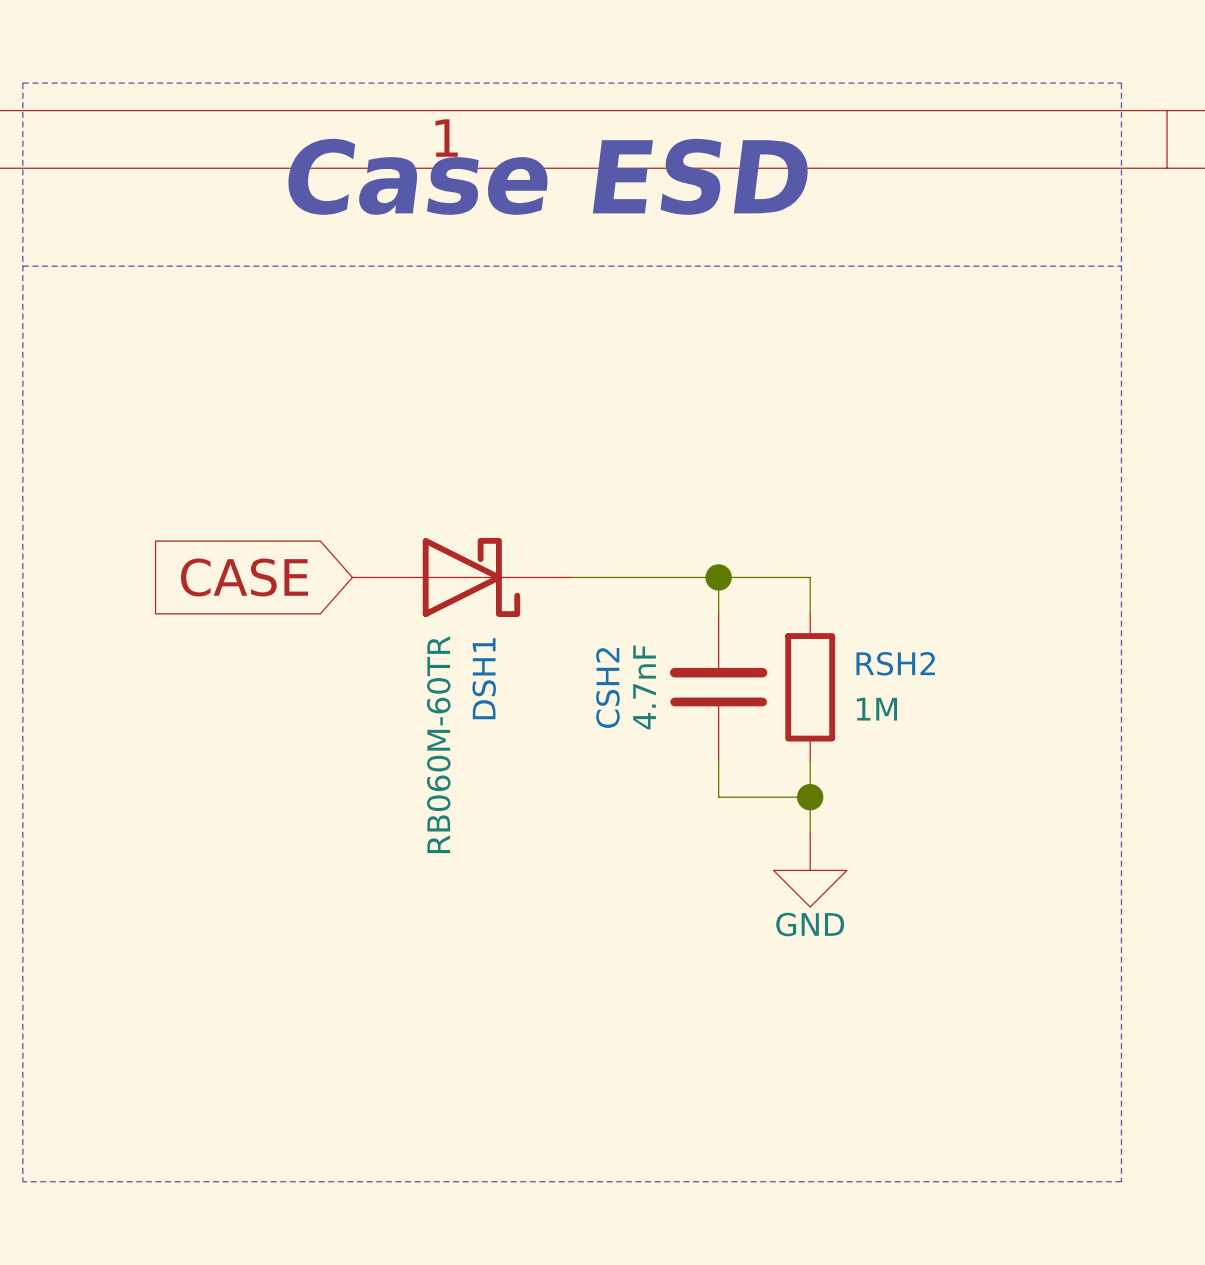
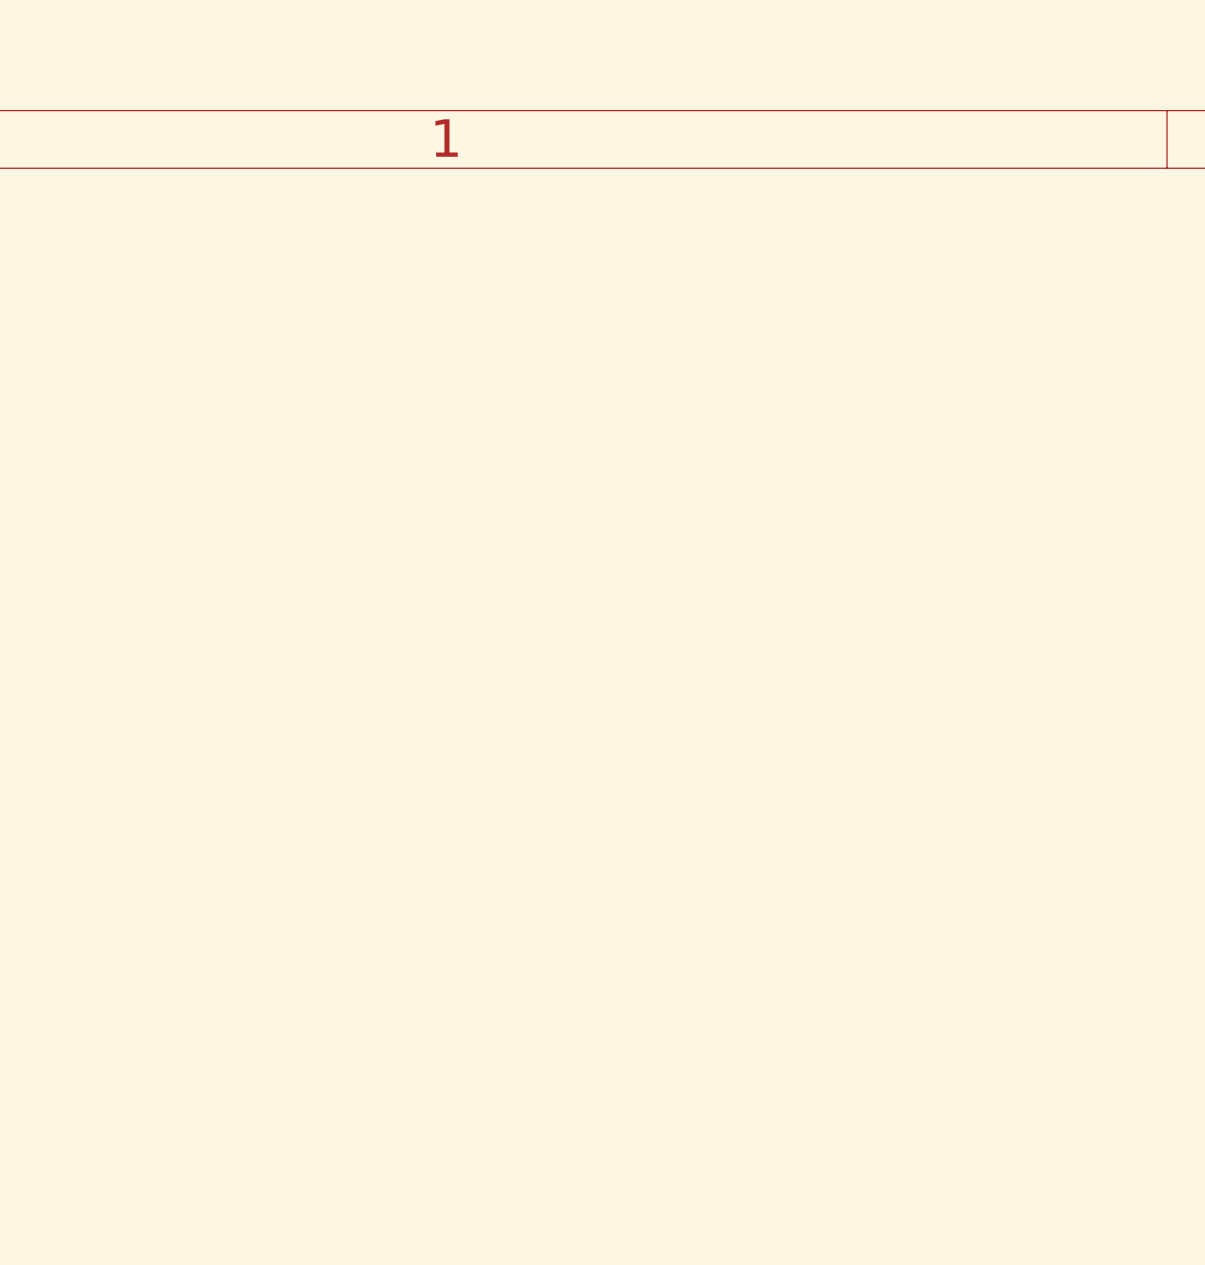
line: (22, 83) (1121, 83) (1121, 1181) (22, 1181) (22, 83) -> none
text: Case ESD (547, 176) -> none
line: (22, 266) (1121, 266) -> none
global label: CASE (244, 577) -> none
DSH1: RB060M-60TR (462, 577) -> none
wire: (572, 577) (810, 577) (810, 614) -> none
wire: (718, 577) (718, 614) -> none
junction: (718, 577) -> none
CSH2: 4.7nF (718, 687) -> none
RSH2: 1M (810, 687) -> none
wire: (718, 760) (718, 797) (810, 797) -> none
wire: (810, 760) (810, 833) -> none
junction: (810, 797) -> none
power symbol: GND (810, 870) -> none

